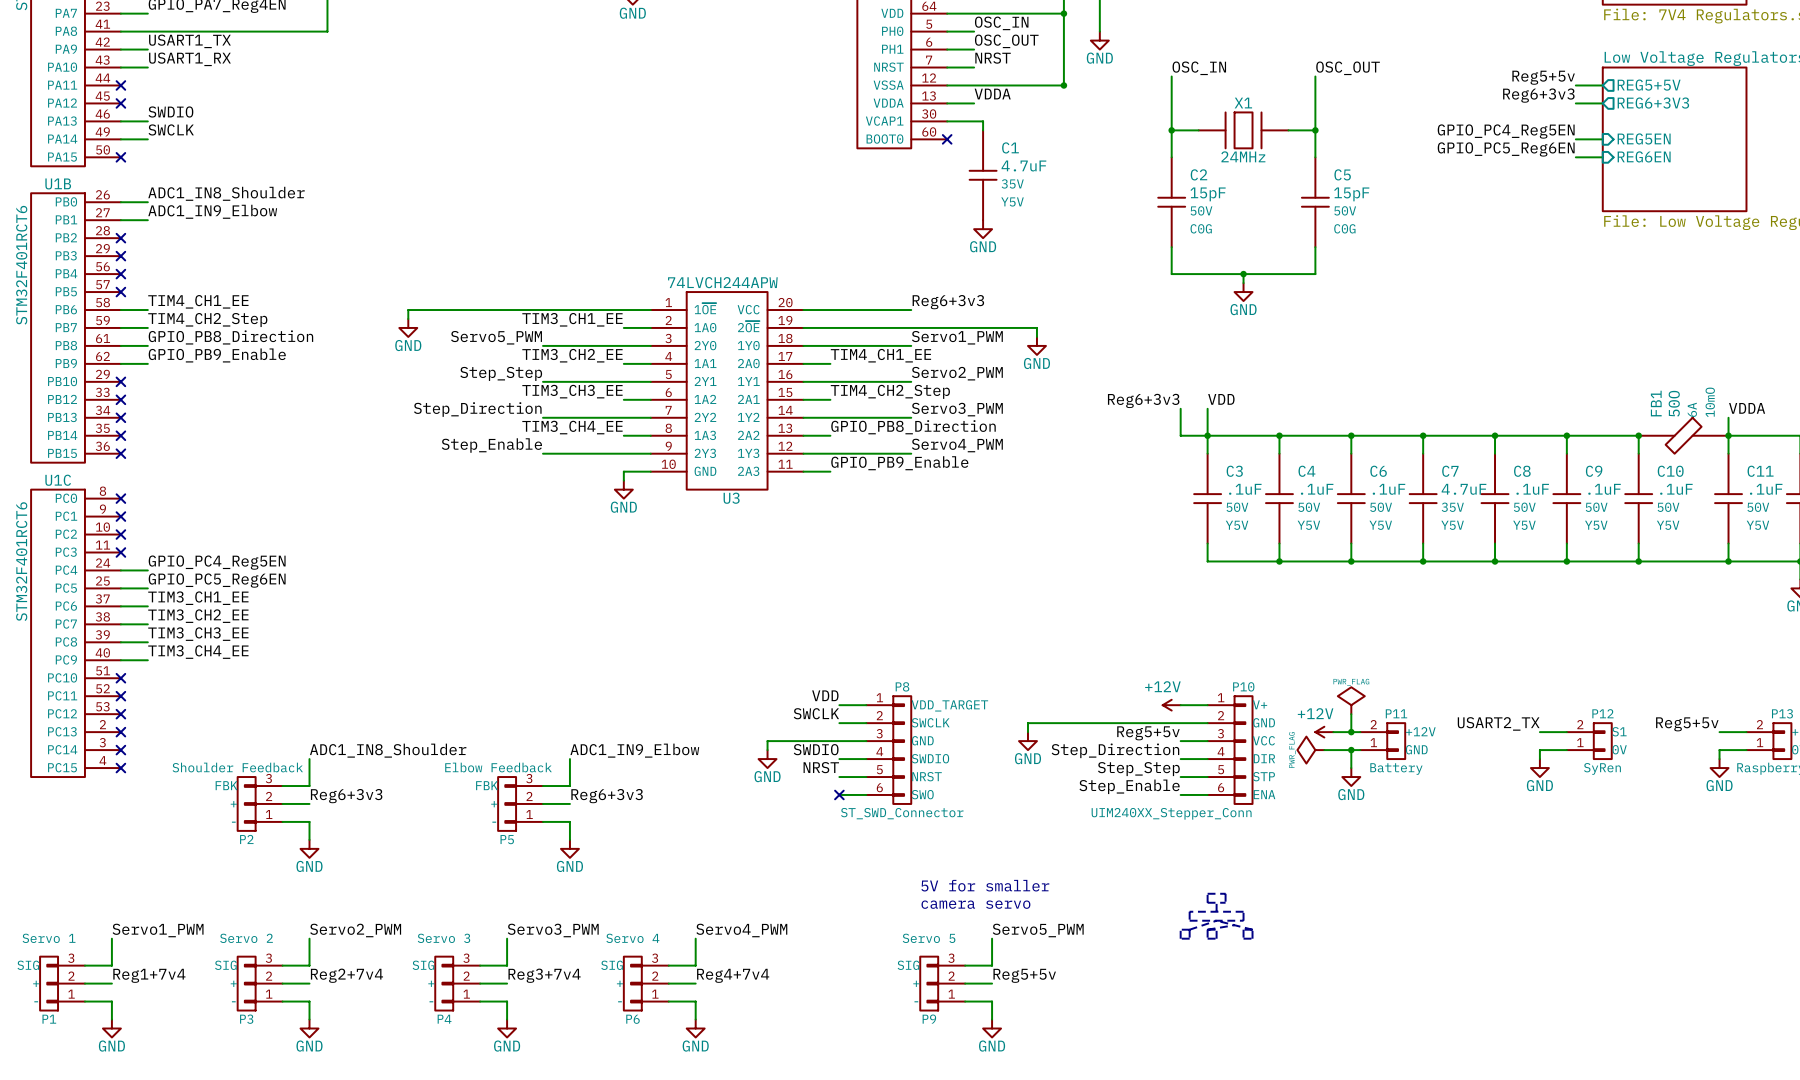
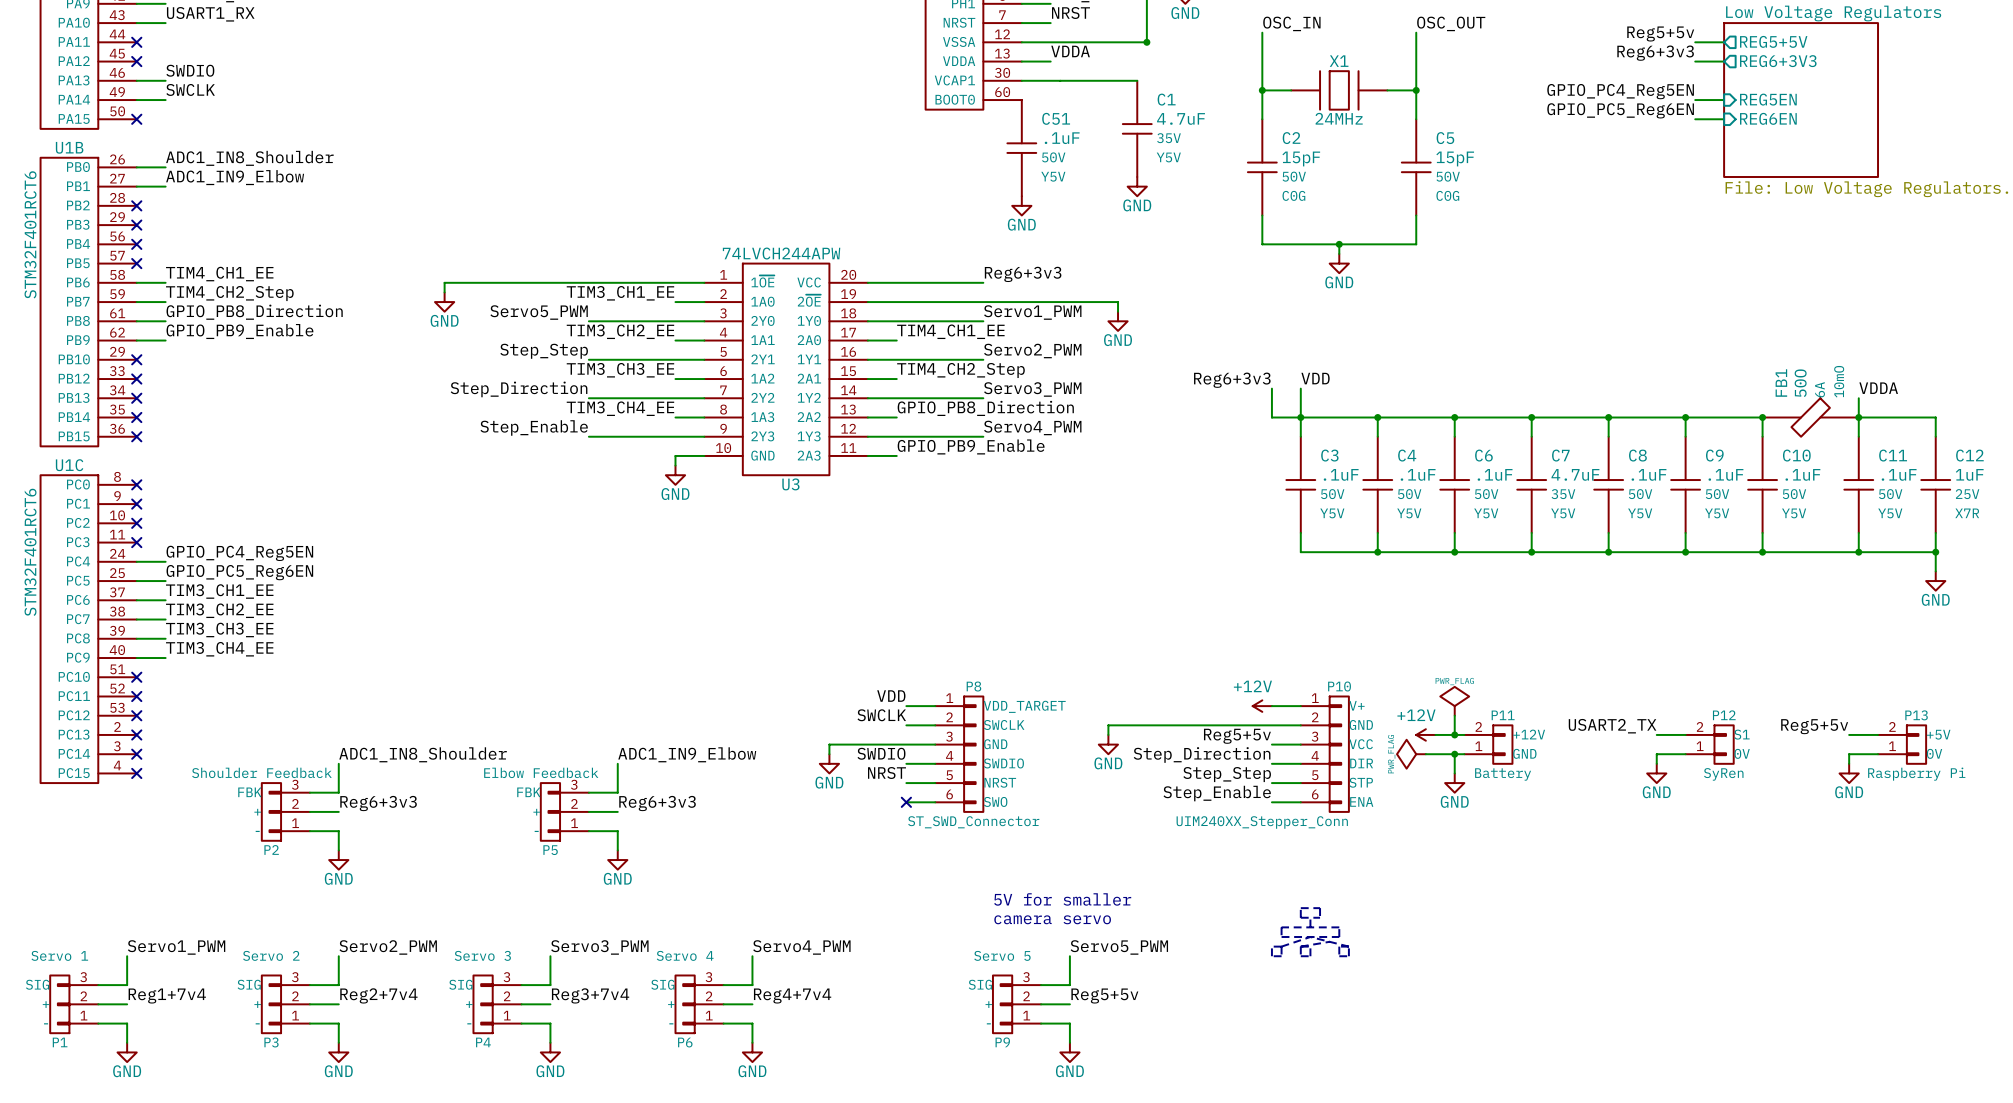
wire: (983, 121) (983, 130) -> (1060, 80) (1137, 80)
no-connect mark: (947, 139) -> none
C1 position: (983, 175) -> (1137, 128)
C51: none -> .1uF (1021, 148)
power symbol: none -> GND (1137, 186)
power symbol: GND (983, 229) -> none
power symbol: none -> GND (1021, 205)

